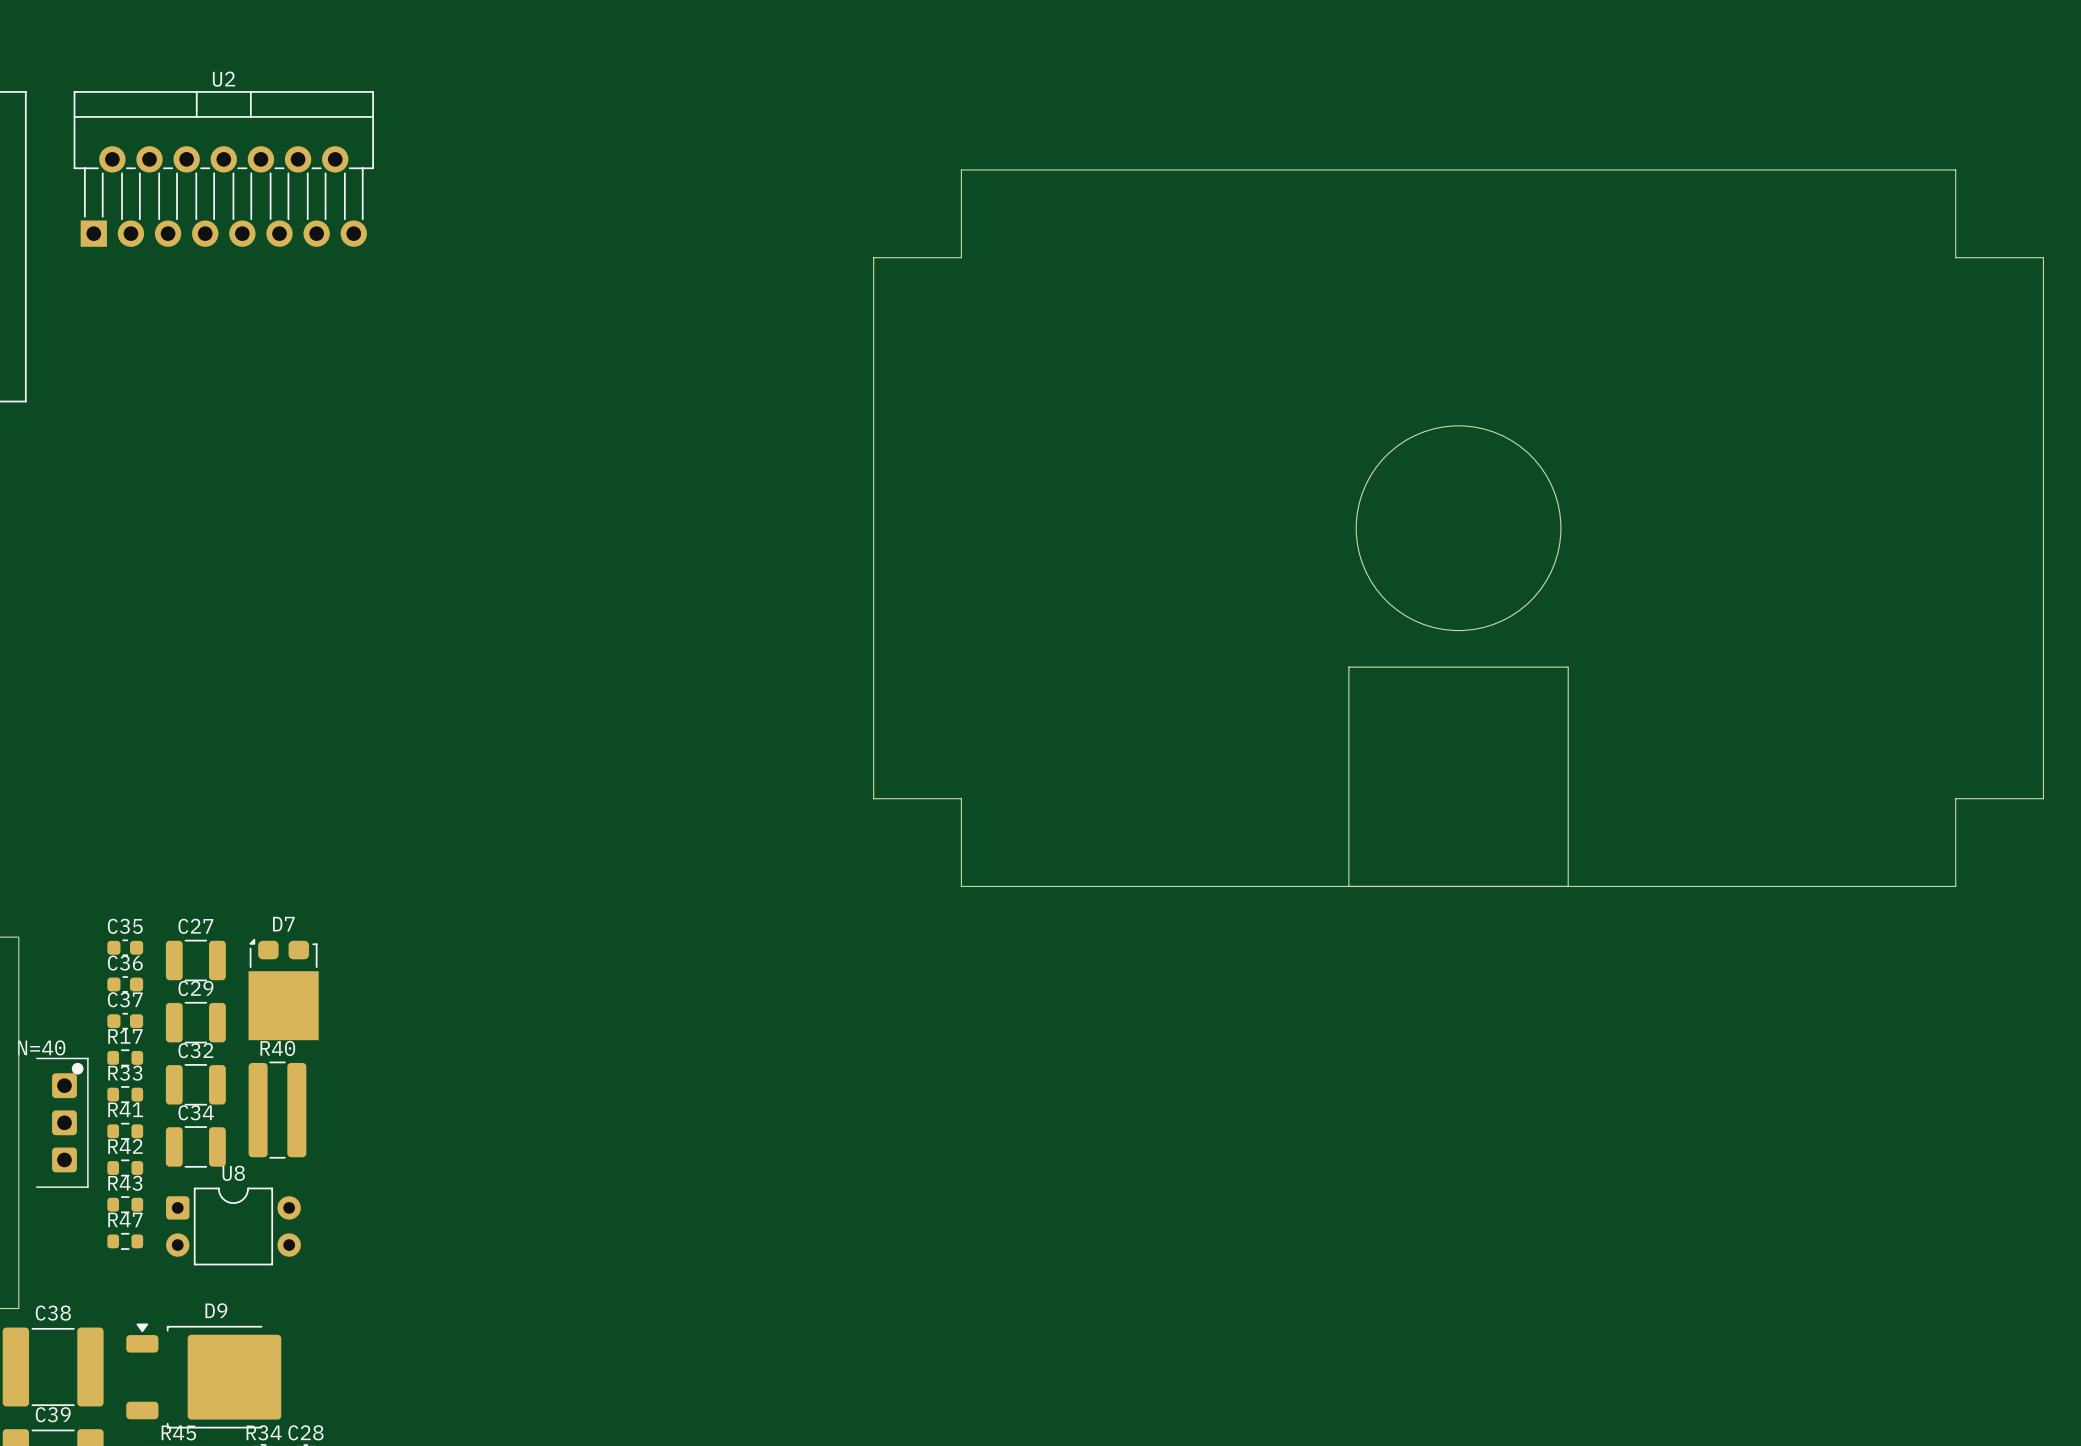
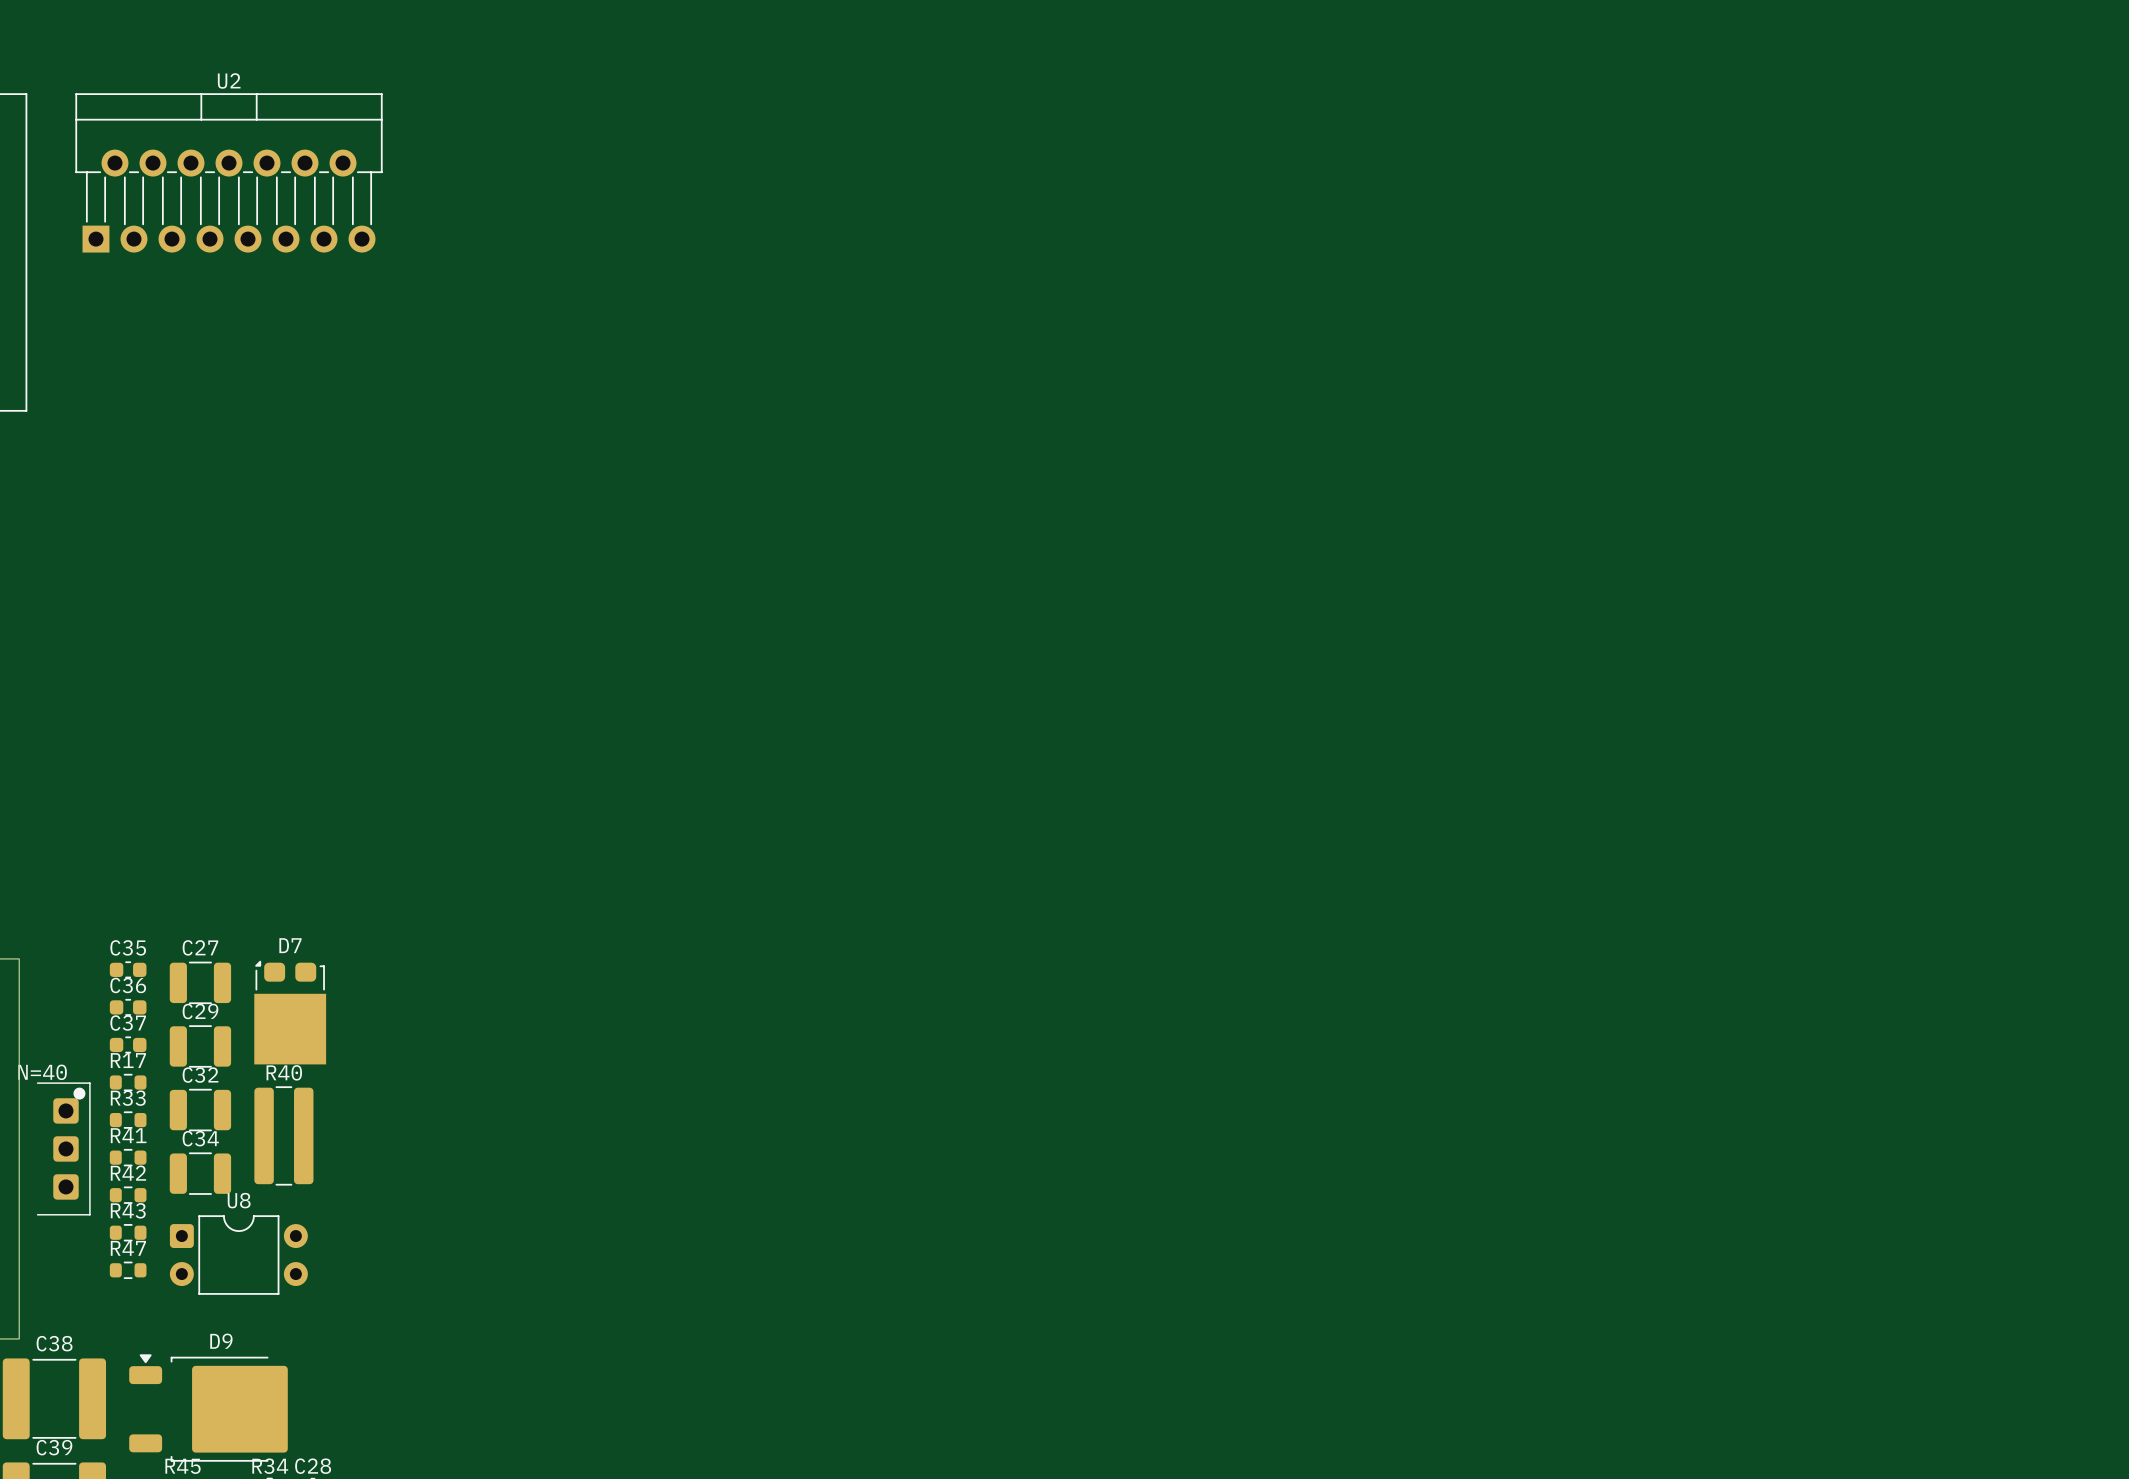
board edge: (961, 169) (961, 257) (873, 257) (873, 798) (961, 798) (961, 886) (1955, 886) (1955, 798) (2043, 798) (2043, 257) (1955, 257) (1955, 169) (961, 169) -> none
round board edge: [1355, 425, 1562, 631] -> none
board edge: (1348, 886) (1348, 667) (1568, 667) (1568, 886) -> none

